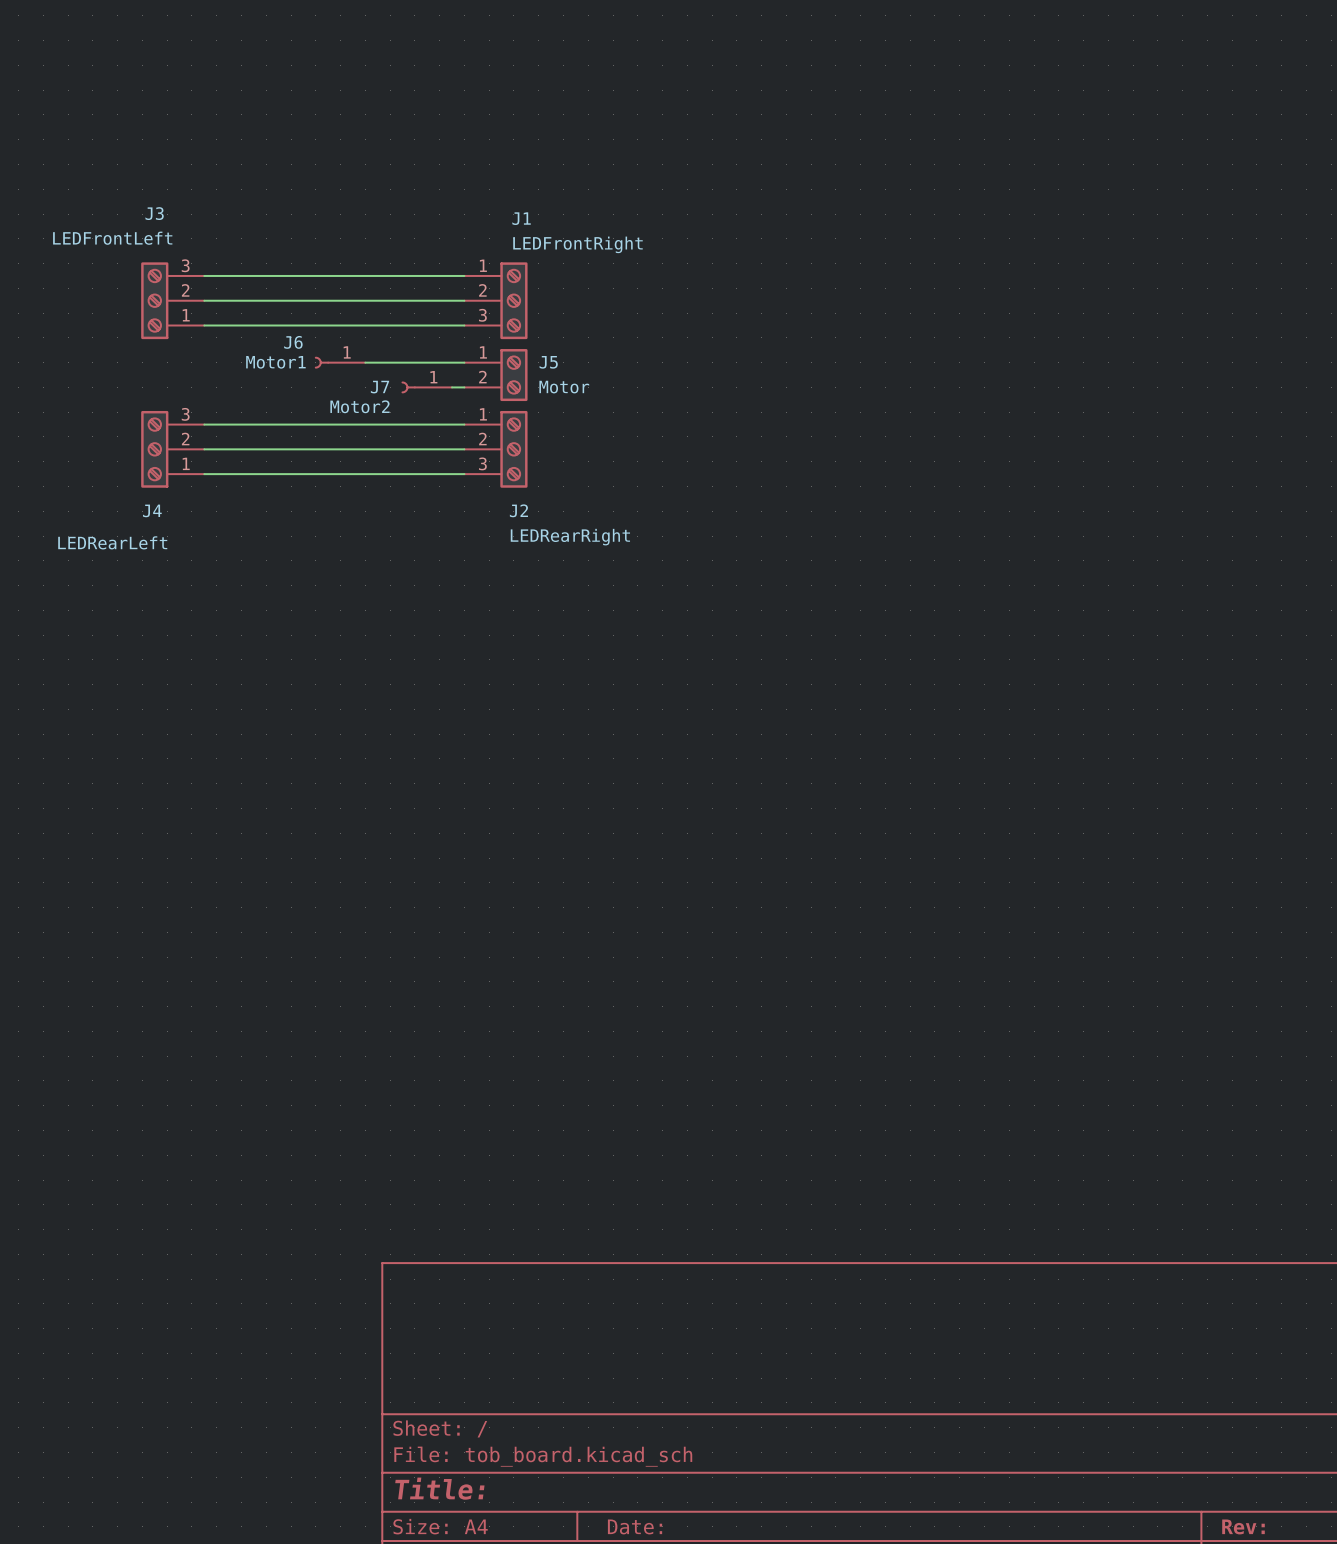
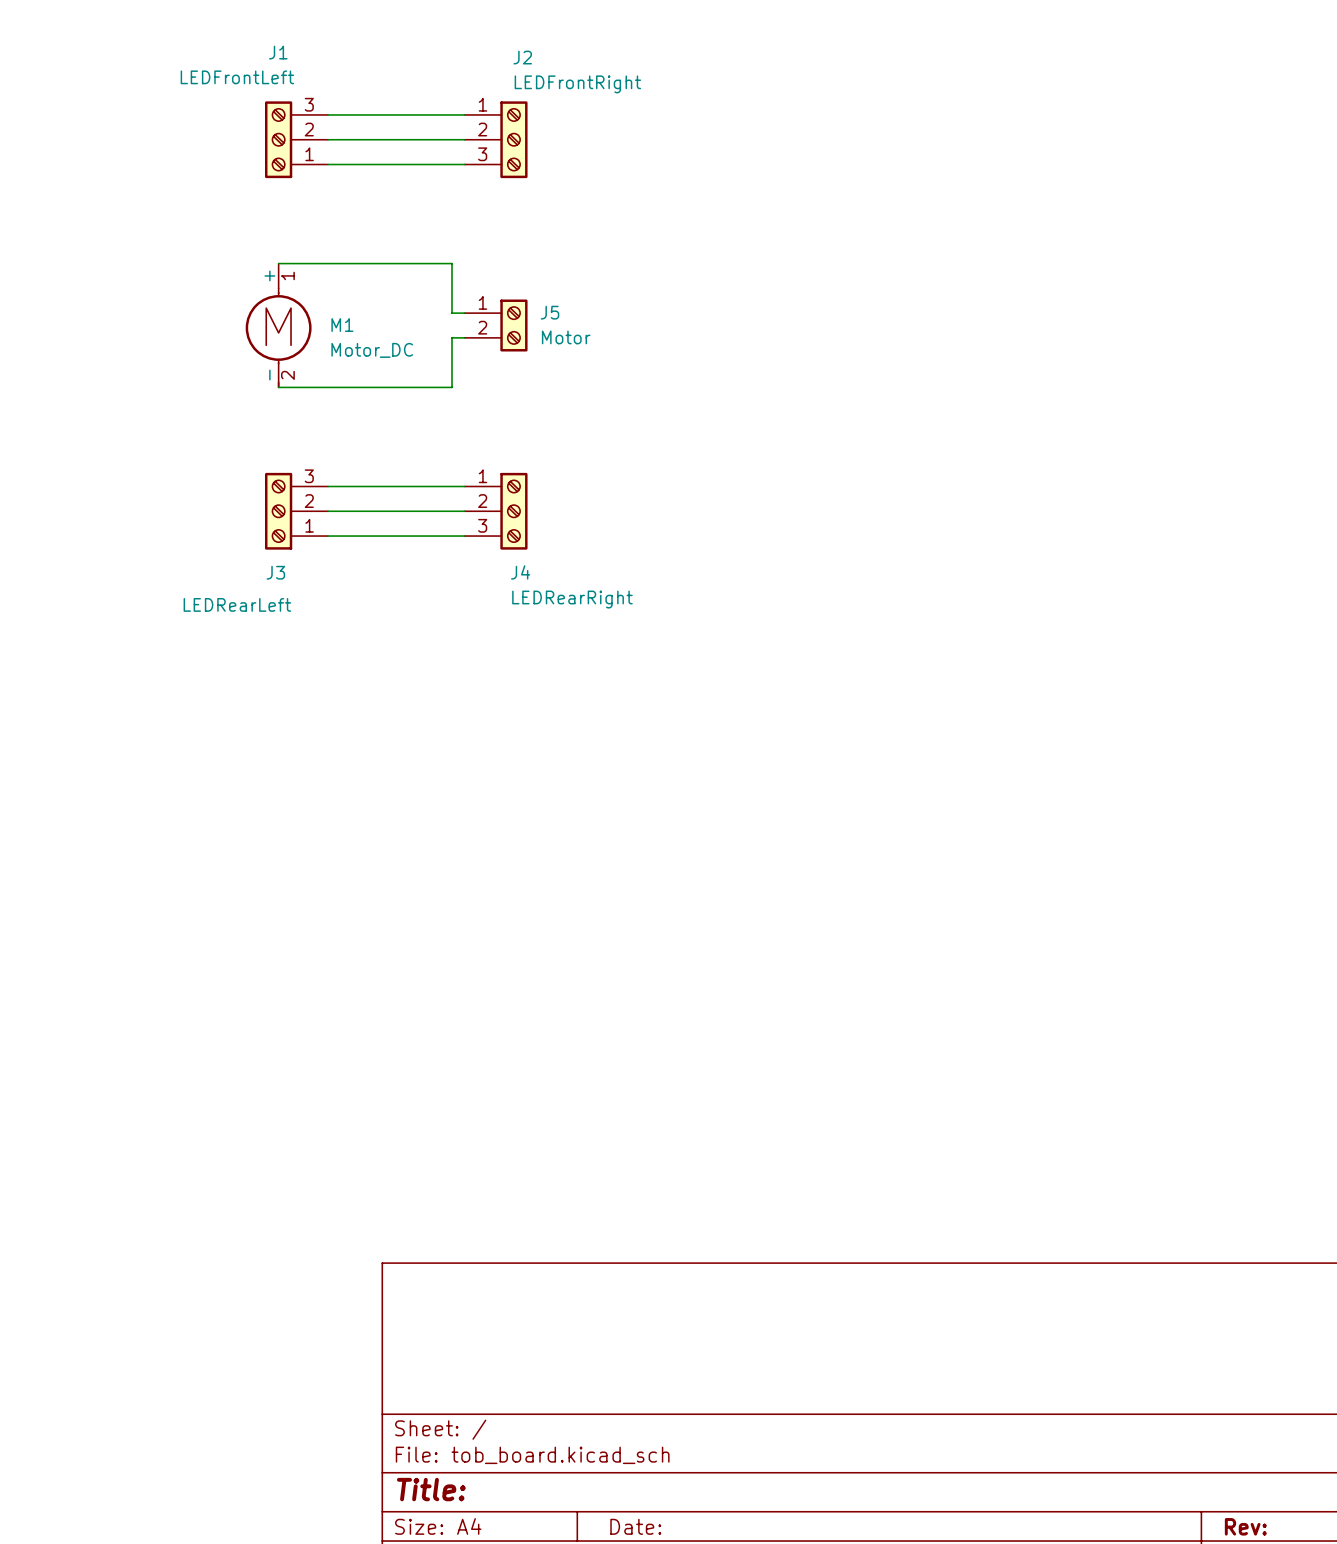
wire: none -> (328, 114) (464, 114)
wire: none -> (328, 139) (464, 139)
wire: none -> (328, 164) (464, 164)
J3 name position: J3 (154, 213) -> J3 (275, 572)
J1 name position: J1 (521, 218) -> J1 (278, 52)
J3 value: LEDFrontLeft (112, 238) -> LEDRearLeft (237, 604)
J1 value: LEDFrontRight (577, 244) -> LEDFrontLeft (237, 77)
wire: none -> (278, 263) (452, 263) (452, 313) (464, 313)
wire: (204, 275) (464, 275) -> none
J3 position: (172, 300) -> (296, 511)
wire: (204, 300) (464, 300) -> none
J1 position: (495, 300) -> (296, 139)
J1 rotation: 0° (513, 300) -> 180° (278, 139)
wire: (204, 325) (464, 325) -> none
M1: none -> Motor_DC (278, 325)
wire: none -> (464, 337) (452, 337) (452, 387) (278, 387)
J6: Motor1 (340, 362) -> none
wire: (365, 362) (464, 362) -> none
J5 position: (495, 375) -> (495, 325)
J7: Motor2 (426, 387) -> none
wire: (452, 387) (464, 387) -> none
wire: (204, 424) (464, 424) -> none
J4 rotation: 0° (154, 449) -> 180° (513, 511)
J4 position: (172, 449) -> (495, 511)
wire: (204, 449) (464, 449) -> none
J2 position: (495, 449) -> (495, 139)
wire: (204, 474) (464, 474) -> none
wire: none -> (328, 486) (464, 486)
J4 name position: J4 (152, 510) -> J4 (520, 572)
J2 name position: J2 (518, 510) -> J2 (522, 57)
wire: none -> (328, 511) (464, 511)
wire: none -> (328, 536) (464, 536)
J2 value: LEDRearRight (570, 537) -> LEDFrontRight (577, 84)
J4 value: LEDRearLeft (112, 542) -> LEDRearRight (572, 599)

